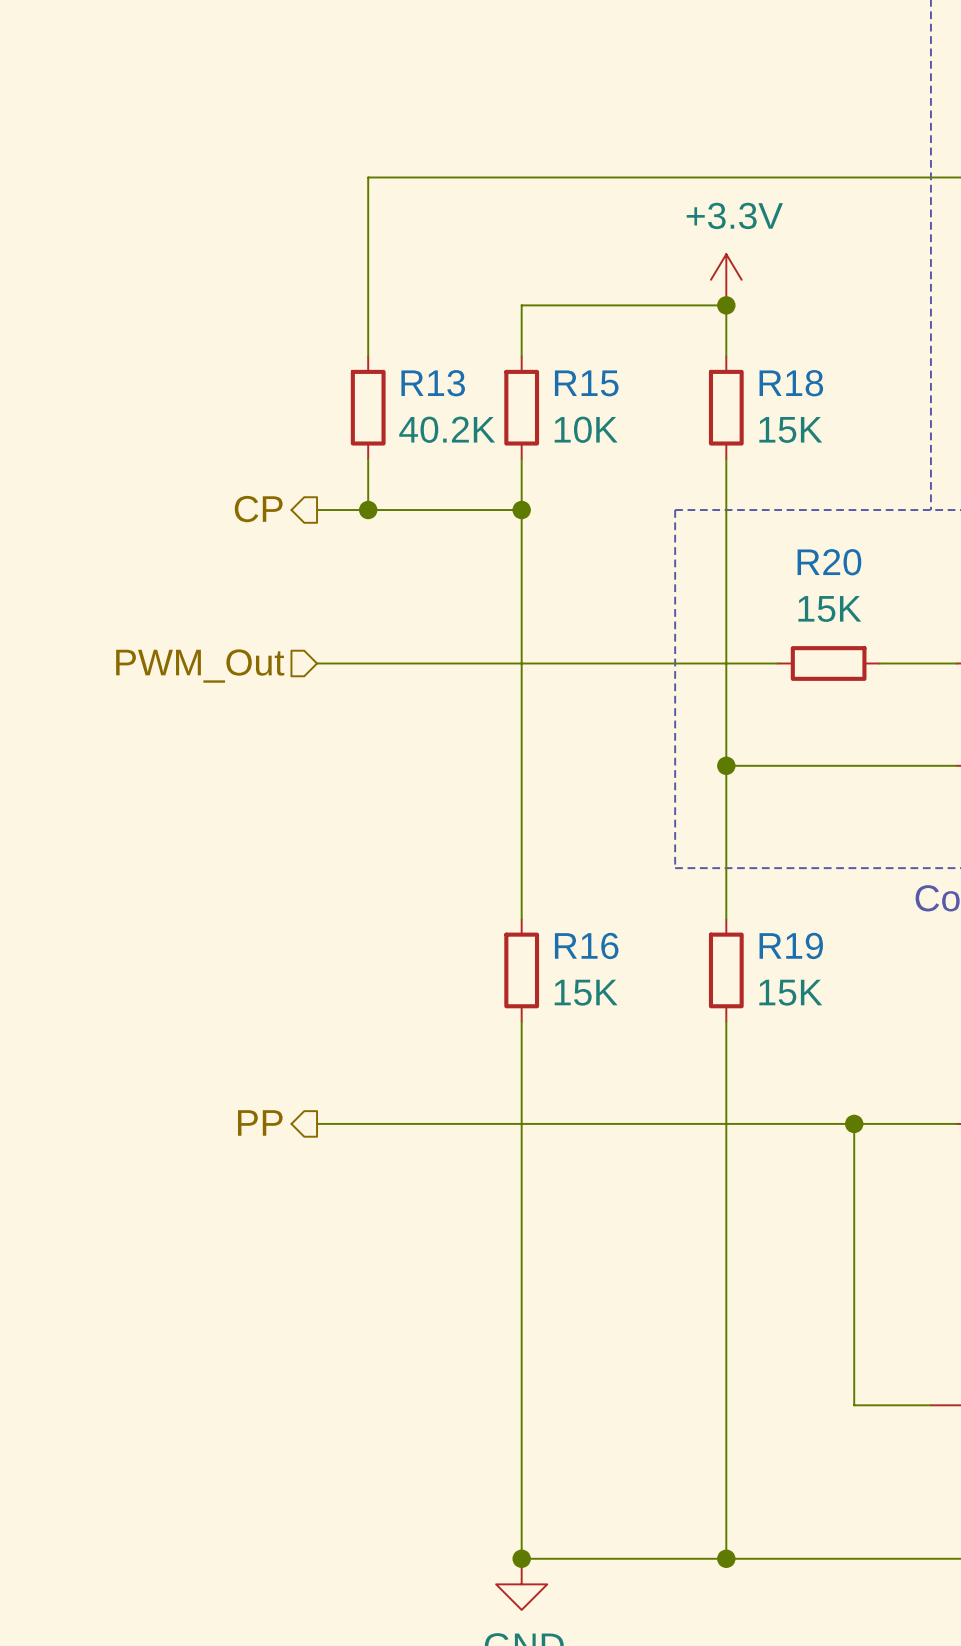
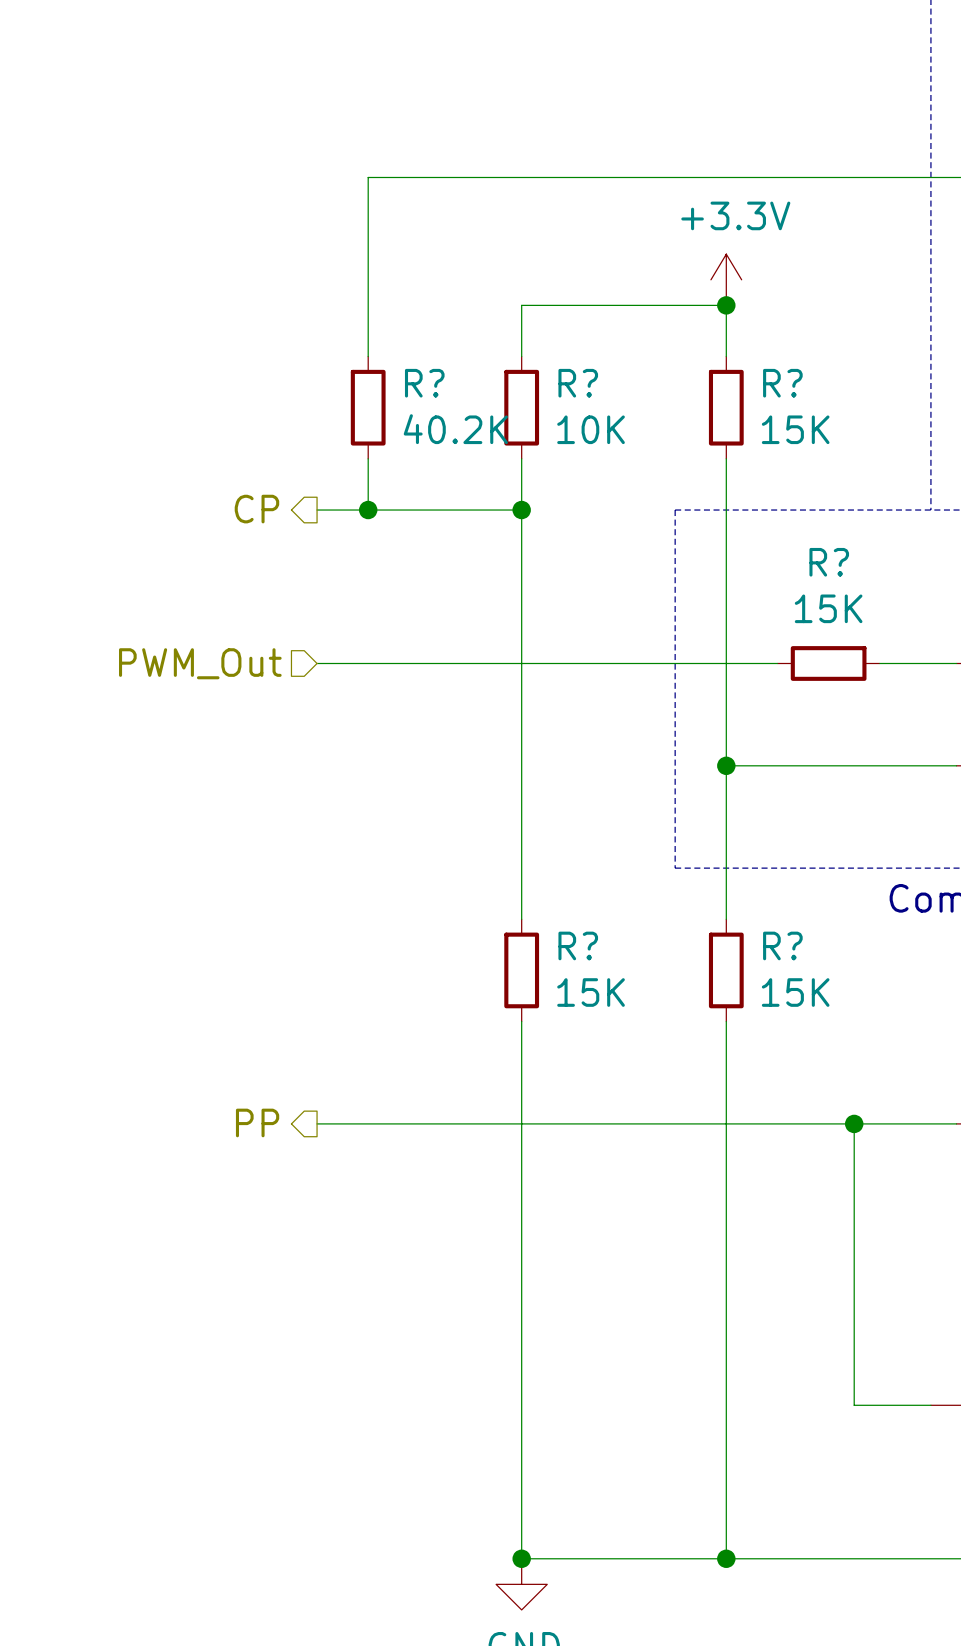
R13 name: R13 (433, 383) -> R? (424, 383)
R15 name: R15 (586, 383) -> R? (578, 383)
R18 name: R18 (791, 383) -> R? (782, 383)
R20 name: R20 (829, 562) -> R? (829, 562)
R16 name: R16 (586, 945) -> R? (578, 945)
R19 name: R19 (791, 945) -> R? (782, 945)

